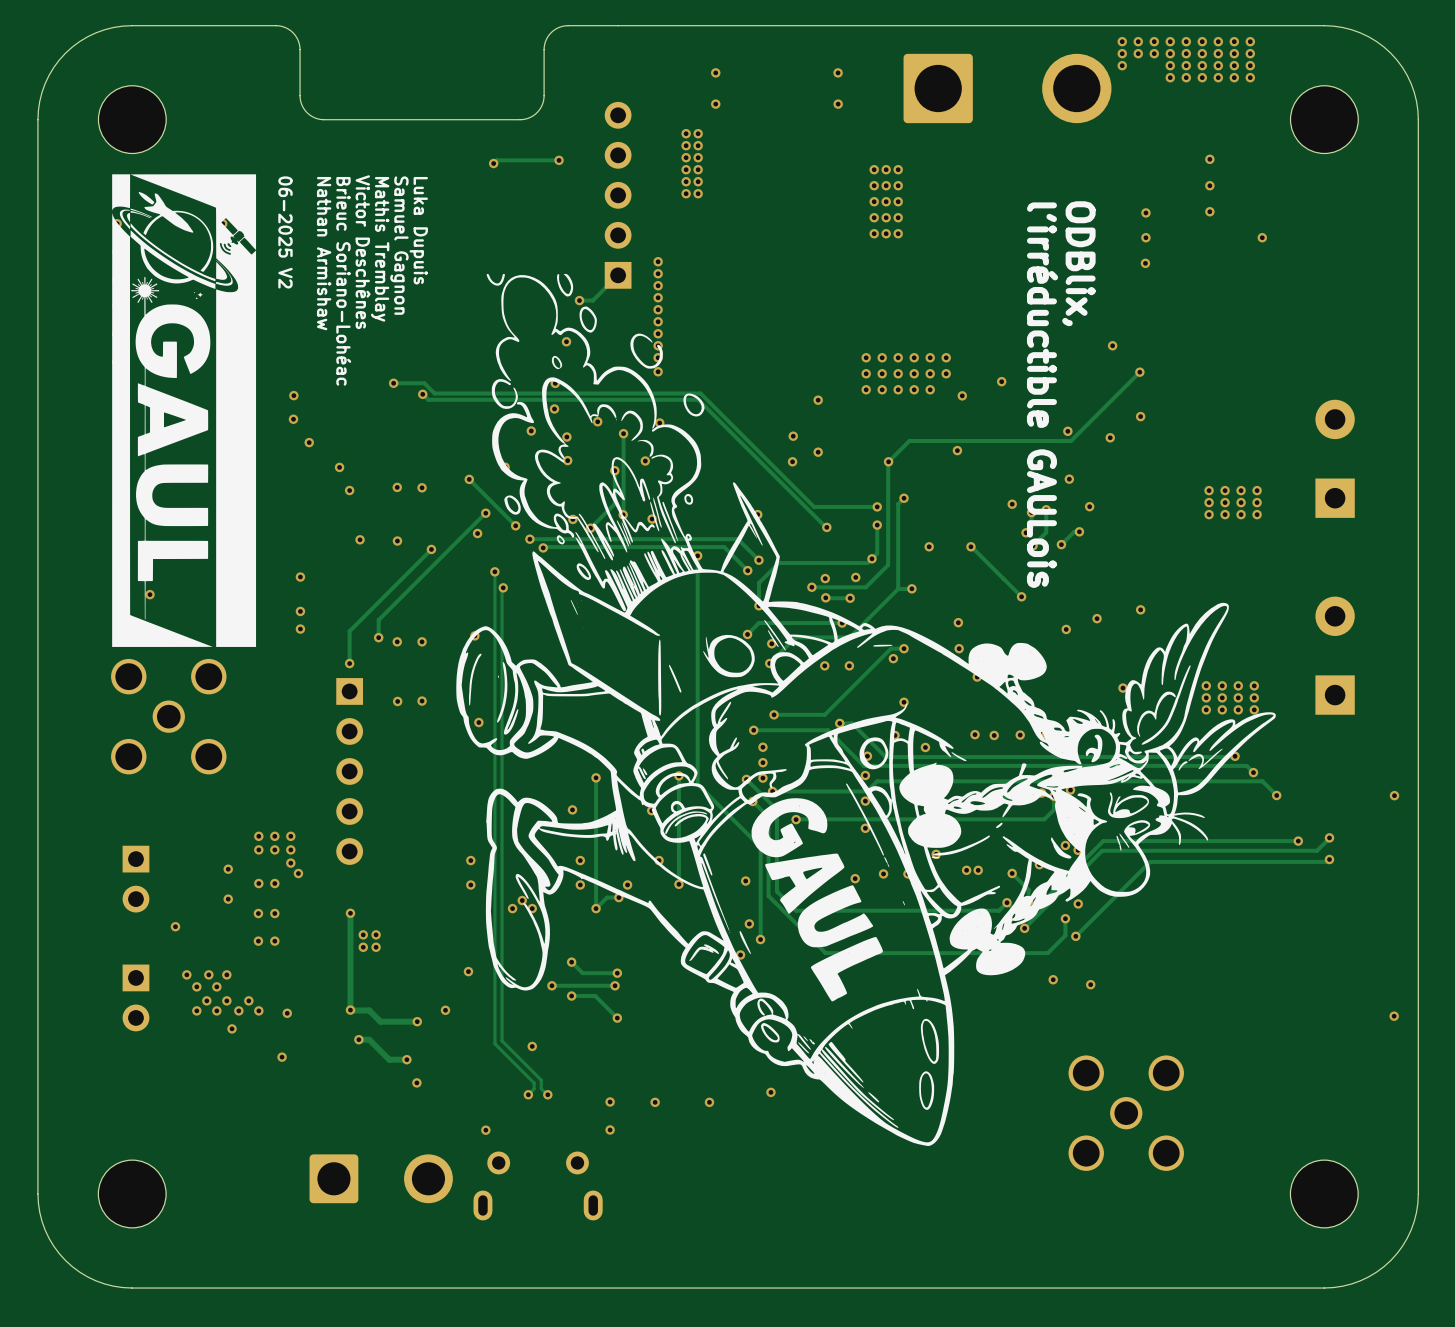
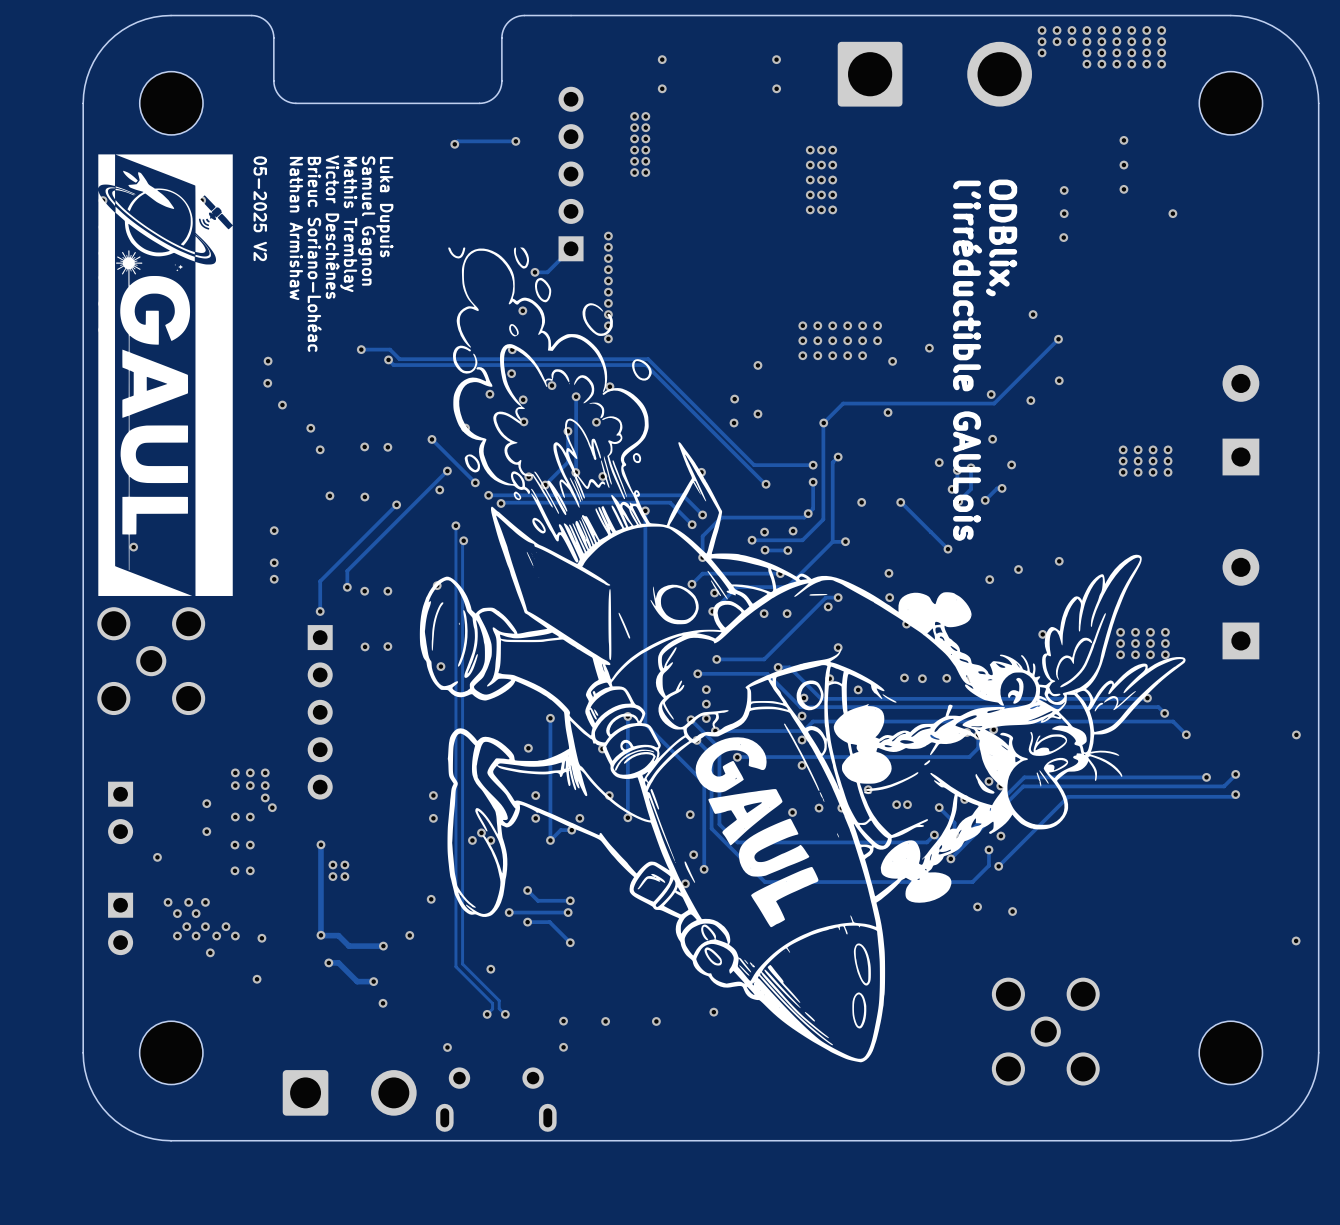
board edge: (189, 25) (122, 26) (104, 29) (87, 36) (65, 53) (53, 67) (45, 83) (38, 110) (37, 1193) (39, 1212) (49, 1238) (59, 1253) (72, 1266) (96, 1280) (113, 1286) (131, 1288) (1333, 1287) (1360, 1280) (1376, 1272) (1396, 1253) (1407, 1238) (1414, 1221) (1417, 1203) (1418, 1135) -> (171, 15) (153, 17) (137, 22) (122, 30) (108, 41) (98, 54) (89, 69) (83, 94) (83, 1052) (84, 1070) (89, 1086) (98, 1101) (115, 1120) (129, 1130) (145, 1136) (171, 1140) (1239, 1140) (1256, 1136) (1272, 1130) (1292, 1115) (1303, 1101) (1312, 1086) (1317, 1070) (1318, 1052)
part position: (132, 119) -> (171, 103)
text: 06-2025 V2 (285, 232) -> 05-2025 V2 (260, 208)
part position: (132, 1193) -> (171, 1052)
part position: (1324, 1193) -> (1230, 1052)

